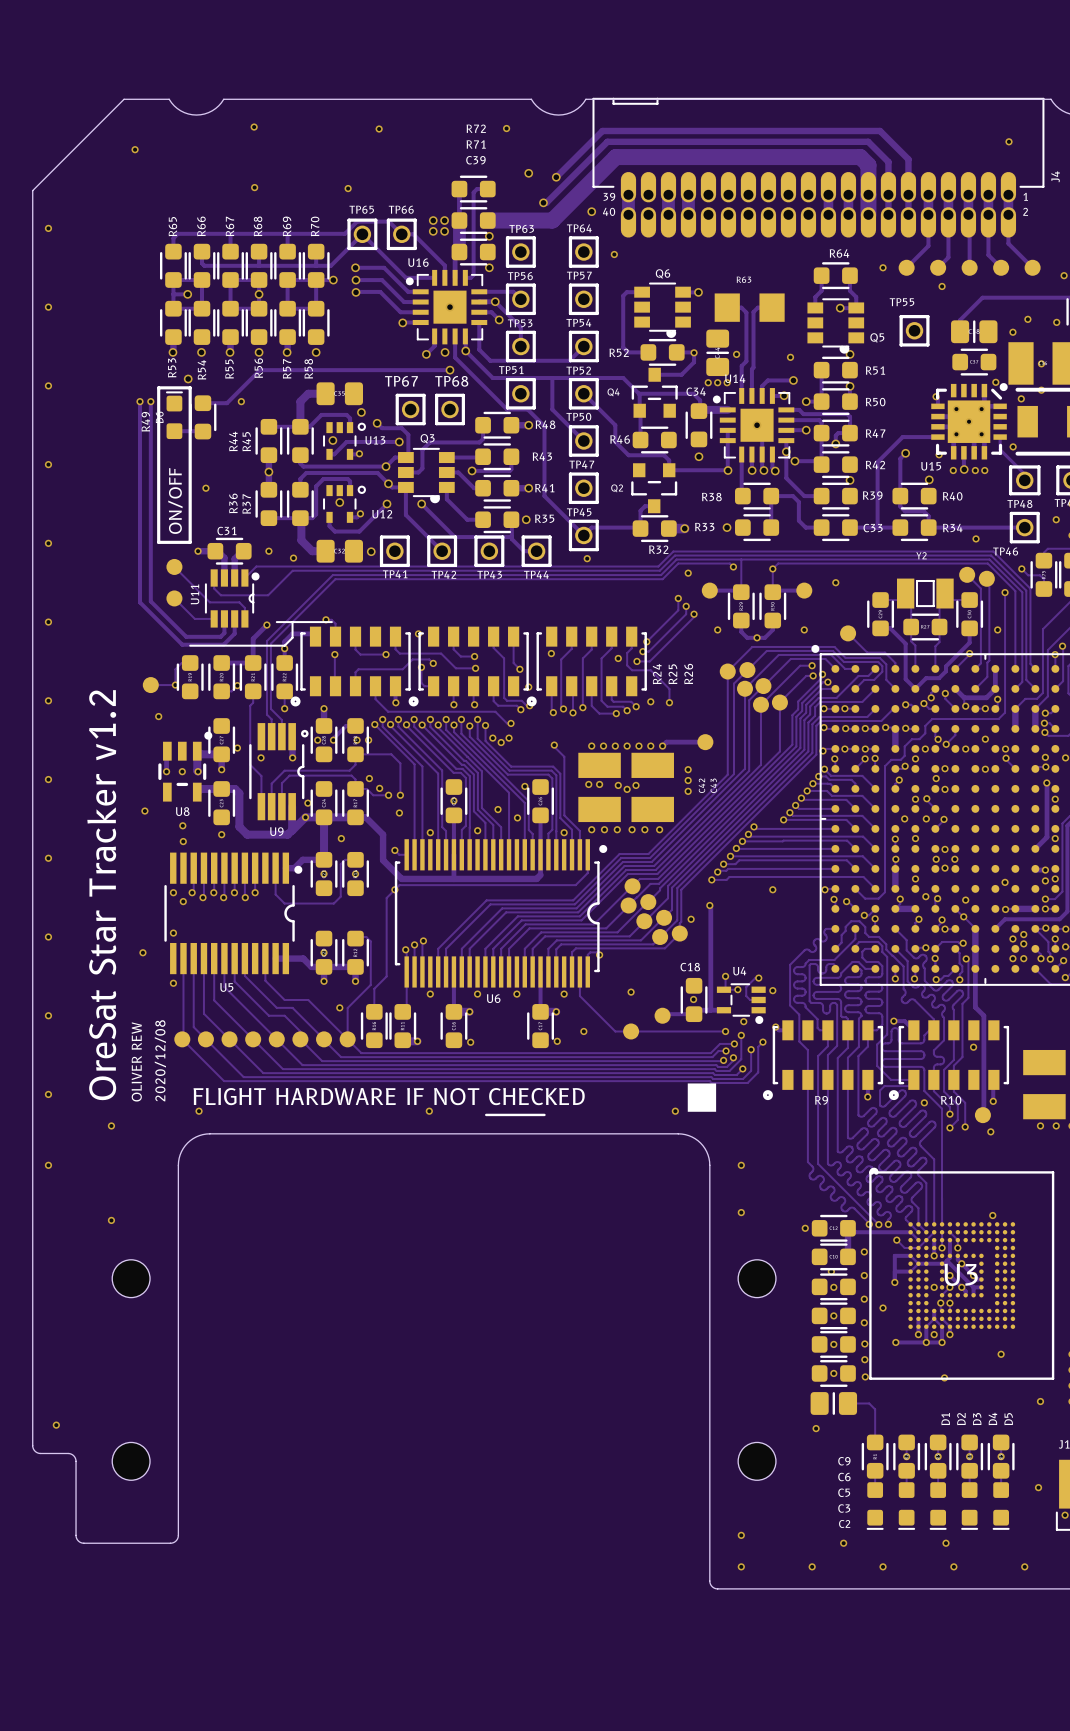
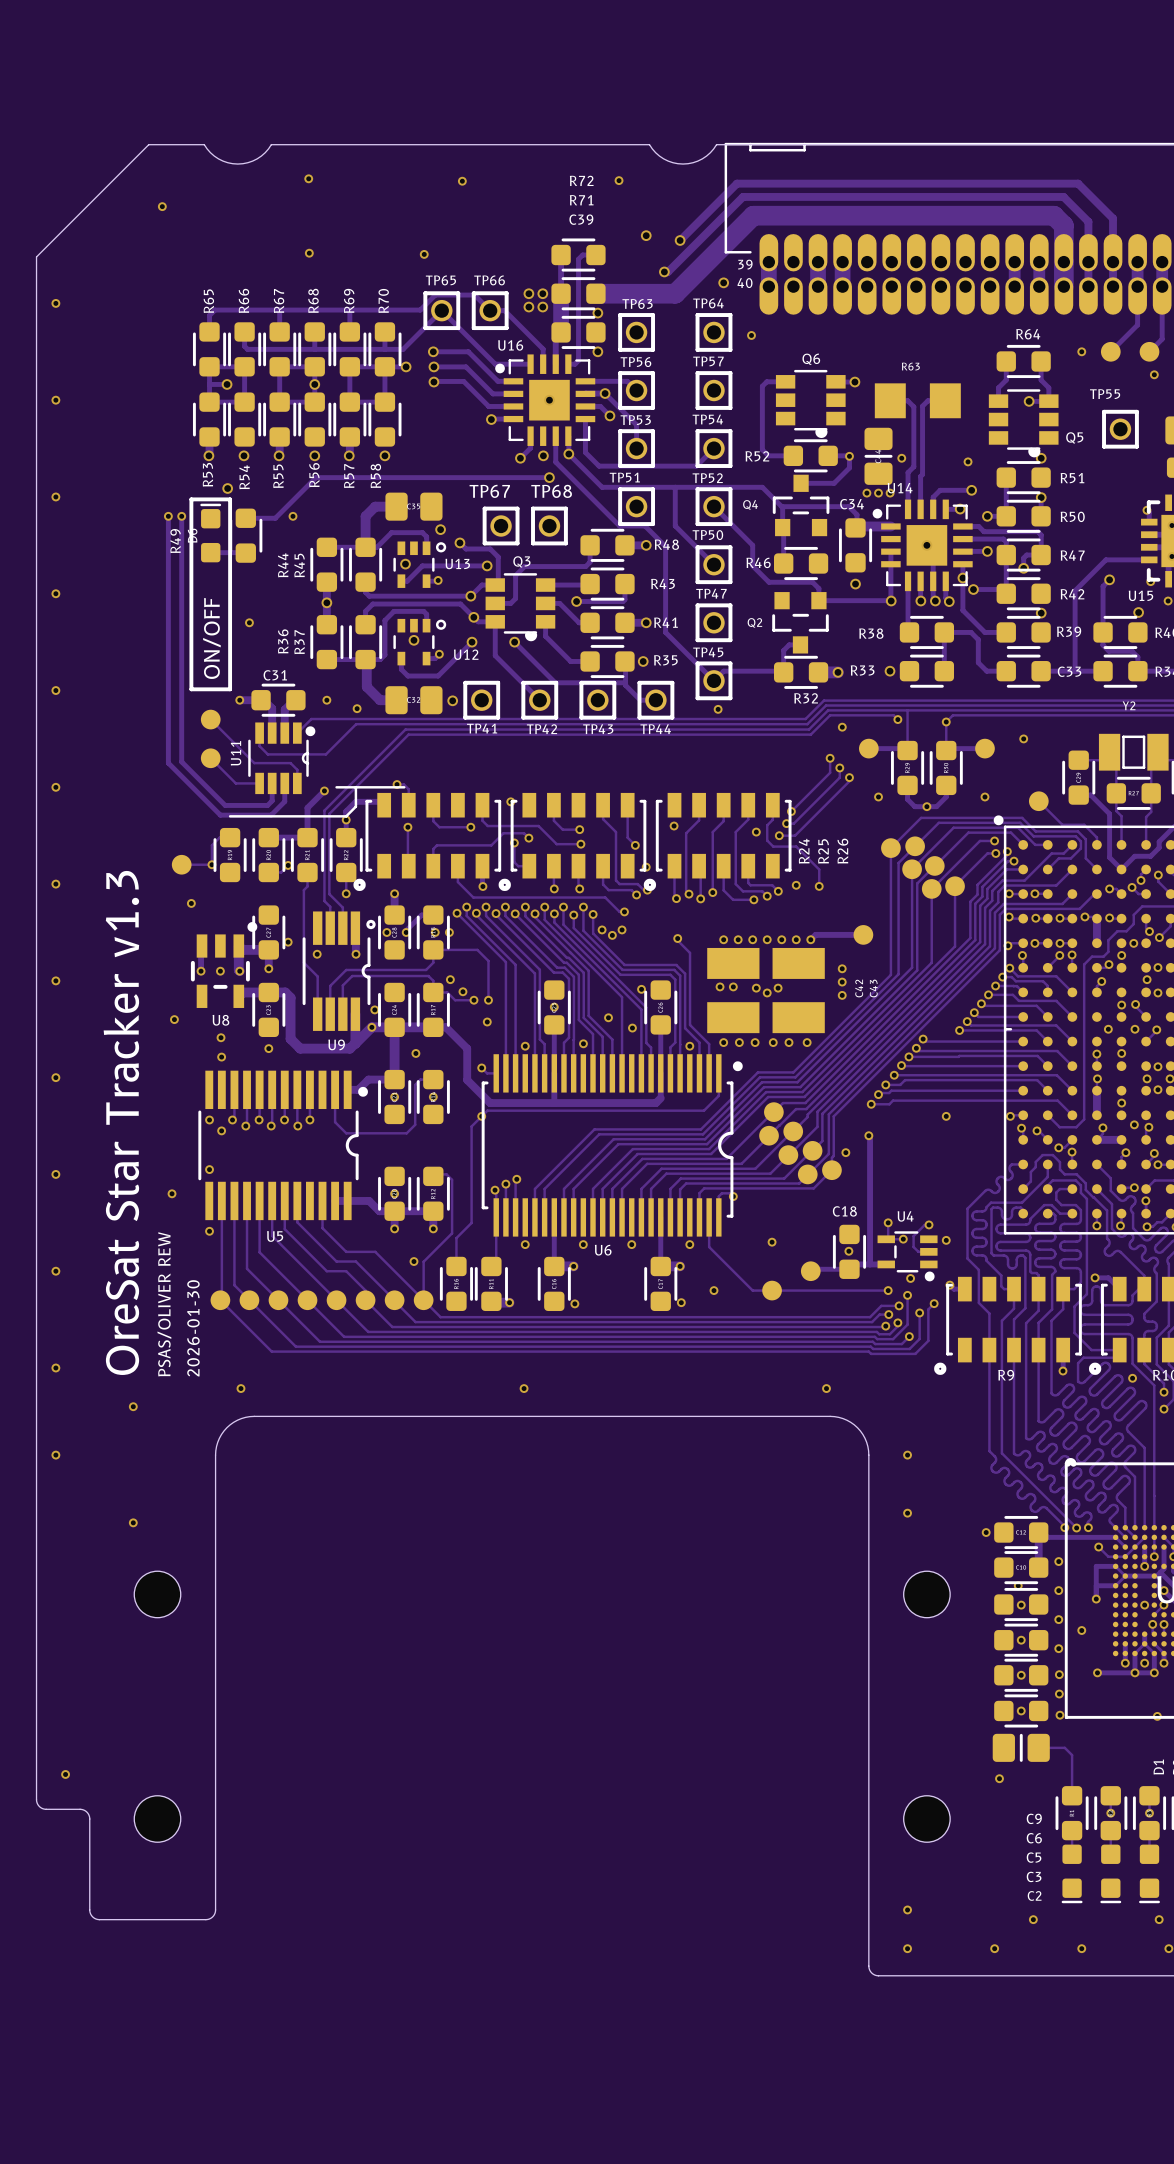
text: OreSat Star Tracker v1.2 (101, 895) -> OreSat Star Tracker v1.3 (121, 1122)
text: 2020/12/08 (160, 1060) -> 2026-01-30 (193, 1328)
text: OLIVER REW (136, 1061) -> PSAS/OLIVER REW (164, 1304)
drawing: [485, 1083, 717, 1117] -> none

